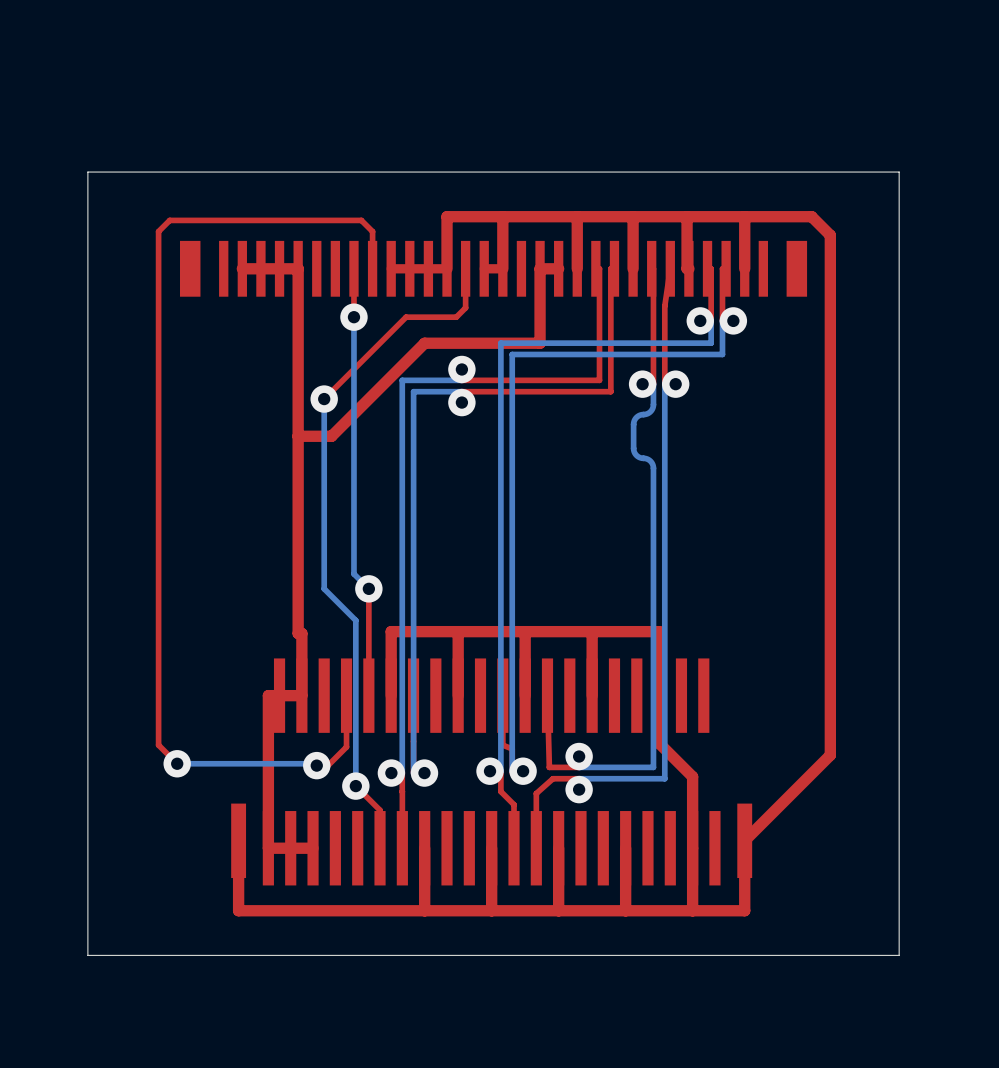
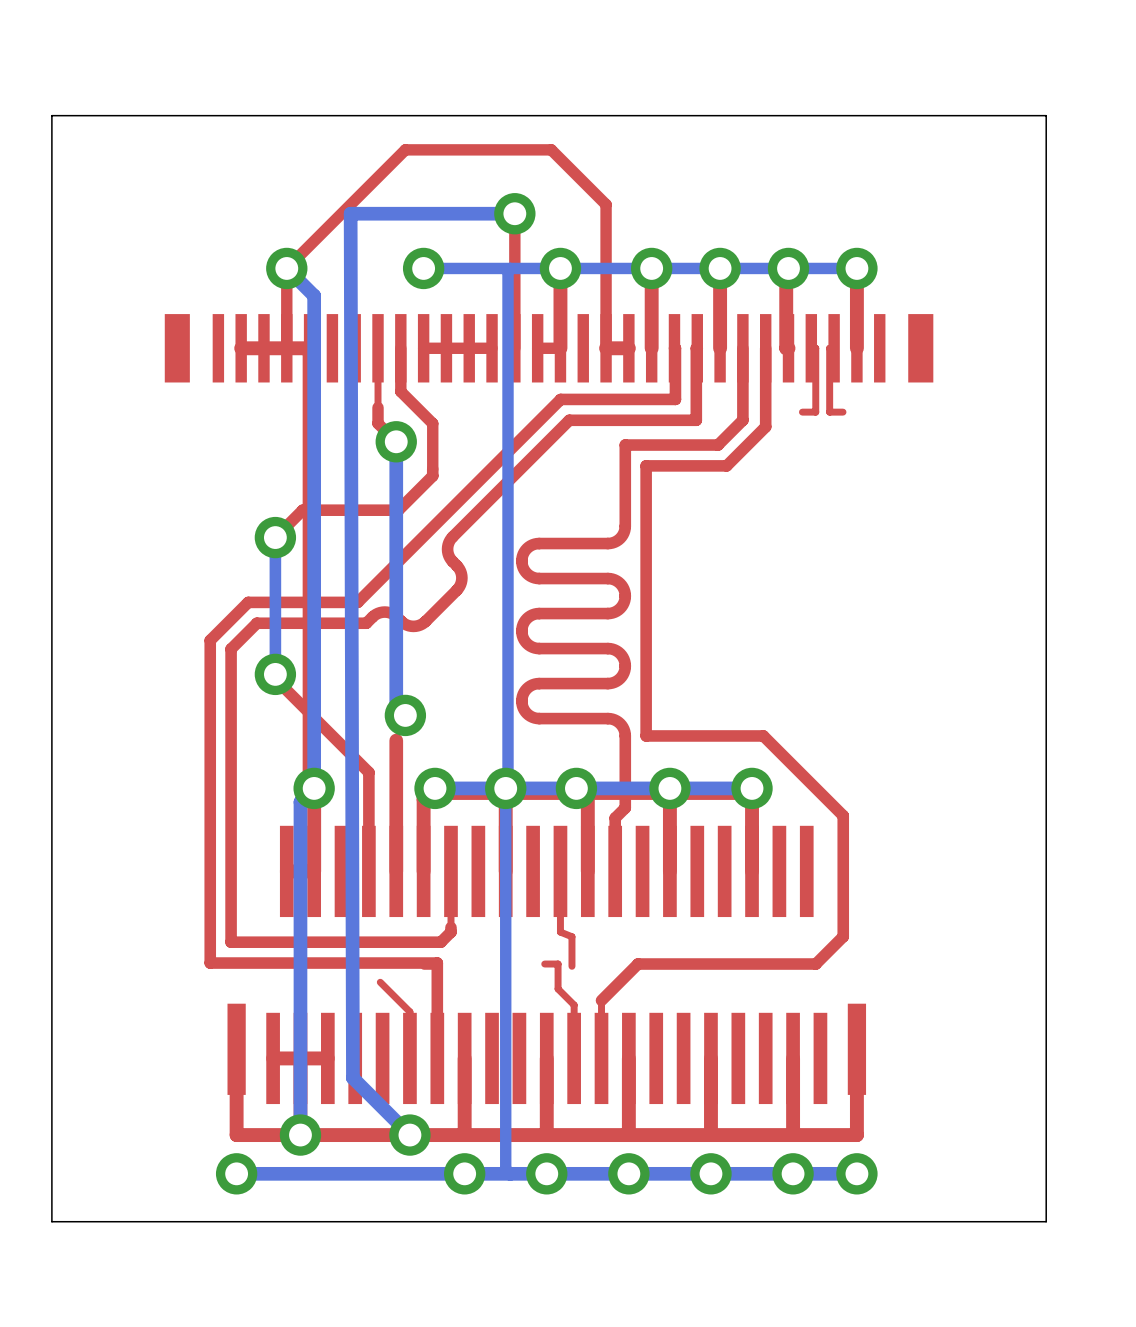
bottom track: none -> (514, 213) (350, 213) (352, 1078) (409, 1135)
via: none -> (514, 213)
board edge: (899, 172) (87, 172) -> (1046, 229) (1046, 115) (51, 115) (51, 229)
bottom track: none -> (286, 268) (314, 295) (314, 788) (300, 802) (300, 1135)
via: none -> (286, 268)
via: none -> (423, 268)
bottom track: none -> (510, 268) (508, 270) (508, 788)
via: none -> (560, 268)
via: none -> (651, 268)
via: none -> (720, 268)
via: none -> (788, 268)
bottom track: none -> (856, 268) (423, 268)
via: none -> (856, 268)
top track: (372, 268) (372, 231) (361, 220) (169, 220) (158, 231) (158, 745) (177, 763) -> (400, 348) (400, 391) (432, 423) (432, 475) (398, 510) (302, 510) (275, 537)
top track: (447, 268) (447, 216) (811, 216) (830, 235) (830, 755) (744, 840) -> none
top track: (465, 268) (465, 307) (456, 317) (406, 317) (324, 399) -> (514, 348) (514, 213)
top track: (540, 268) (540, 343) (424, 343) (331, 436) (298, 436) -> (606, 348) (606, 204) (551, 149) (405, 149) (286, 268) (286, 348)
top track: (596, 268) (599, 268) (599, 380) (461, 380) (461, 369) -> (674, 348) (675, 399) (560, 399) (357, 602) (248, 602) (210, 640) (210, 963) (437, 963) (437, 1058)
top track: (613, 268) (610, 268) (610, 391) (461, 391) (461, 402) -> (697, 348) (696, 420) (569, 420) (451, 538) (447, 546) (448, 553) (460, 571) (461, 582) (456, 590) (422, 624) (408, 625) (393, 614) (384, 612) (376, 614) (366, 623) (256, 623) (231, 649) (231, 942) (440, 942) (450, 932) (450, 927)
top track: (651, 268) (653, 268) (653, 384) (642, 384) -> (742, 348) (742, 420) (718, 445) (625, 445) (625, 526) (620, 538) (610, 543) (534, 544) (525, 550) (521, 560)
top track: (670, 268) (664, 306) (664, 384) (675, 384) -> (765, 348) (765, 426) (726, 465) (646, 465) (646, 735) (763, 735) (843, 815) (843, 936) (815, 964) (637, 964) (601, 1000)
top track: none -> (378, 407) (378, 423) (396, 441)
bottom track: (353, 317) (353, 573) (368, 588) -> none
via position: (353, 317) -> (396, 441)
bottom track: (700, 320) (711, 320) (711, 343) (500, 343) (500, 771) (490, 771) -> none
via: (700, 320) -> none
bottom track: (733, 320) (722, 320) (722, 354) (512, 354) (512, 771) (523, 771) -> none
via: (733, 320) -> none
bottom track: none -> (396, 441) (396, 706) (405, 715)
bottom track: (461, 369) (461, 380) (402, 380) (402, 773) (391, 773) -> none
via: (461, 369) -> none
bottom track: (642, 384) (653, 384) (652, 409) (647, 413) (637, 416) (633, 424) (634, 452) (638, 457) (649, 460) (653, 468) (653, 767) (579, 767) (579, 756) -> none
via: (642, 384) -> none
bottom track: (675, 384) (664, 384) (664, 778) (579, 778) (579, 789) -> none
via: (675, 384) -> none
bottom track: (324, 399) (324, 588) (355, 620) (355, 786) -> none
via: (324, 399) -> none
bottom track: (461, 402) (461, 391) (413, 391) (413, 773) (424, 773) -> none
via: (461, 402) -> none
bottom track: none -> (275, 537) (275, 674)
via: none -> (275, 537)
top track: none -> (521, 561) (525, 571) (534, 577) (610, 578) (620, 583) (625, 595)
top track: none -> (625, 596) (621, 606) (612, 612) (536, 613) (526, 618) (521, 630) (525, 641) (534, 647) (610, 648) (620, 653) (625, 665)
top track: none -> (625, 666) (621, 676) (612, 682) (536, 683) (526, 688) (521, 700)
via: none -> (275, 674)
top track width: thin (368, 588) (368, 695) -> thick (396, 740) (396, 871)
via position: (368, 588) -> (405, 715)
via: none -> (314, 788)
via: none -> (435, 788)
bottom track: none -> (505, 788) (505, 1169) (510, 1173)
via: none -> (505, 788)
via: none -> (576, 788)
via: none -> (669, 788)
bottom track: none -> (752, 788) (435, 788)
via: none -> (752, 788)
top track: (279, 695) (268, 695) (268, 848) -> none
top track: (346, 695) (346, 747) (327, 765) (316, 765) -> (368, 871) (368, 772) (275, 678) (275, 674)
top track: (547, 695) (549, 767) (579, 767) (579, 756) -> (615, 871) (615, 818) (625, 807) (625, 735) (622, 727) (616, 720) (610, 718) (534, 717) (525, 711) (521, 701)
top track: (659, 695) (659, 743) (692, 776) (692, 848) -> none
via: (579, 756) -> none
bottom track: (177, 763) (314, 763) (316, 765) -> none
via: (177, 763) -> none
via: (316, 765) -> none
via: (490, 771) -> none
via: (523, 771) -> none
via: (391, 773) -> none
via: (424, 773) -> none
via: (355, 786) -> none
top track: (579, 789) (579, 778) (552, 778) (536, 793) (536, 800) -> none
via: (579, 789) -> none
via: none -> (300, 1135)
via: none -> (409, 1135)
via: none -> (236, 1173)
via: none -> (464, 1173)
via: none -> (546, 1173)
via: none -> (628, 1173)
via: none -> (710, 1173)
via: none -> (793, 1173)
bottom track: none -> (856, 1173) (236, 1173)
via: none -> (856, 1173)
board edge: (899, 955) (87, 955) -> (1046, 1189) (1046, 1221) (51, 1221) (51, 1189)

